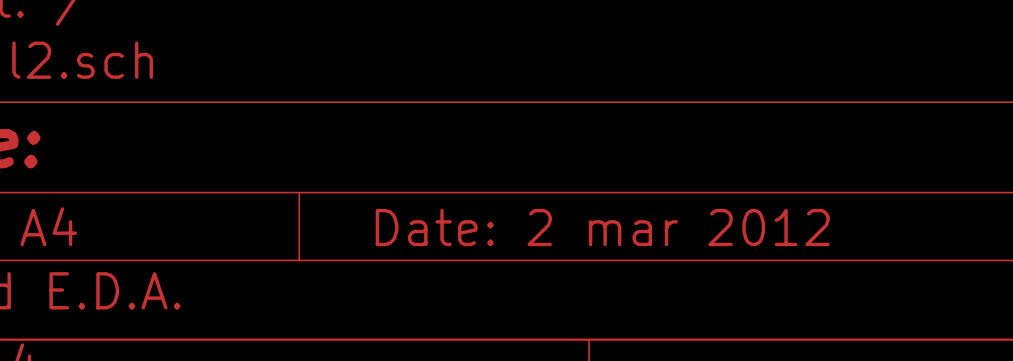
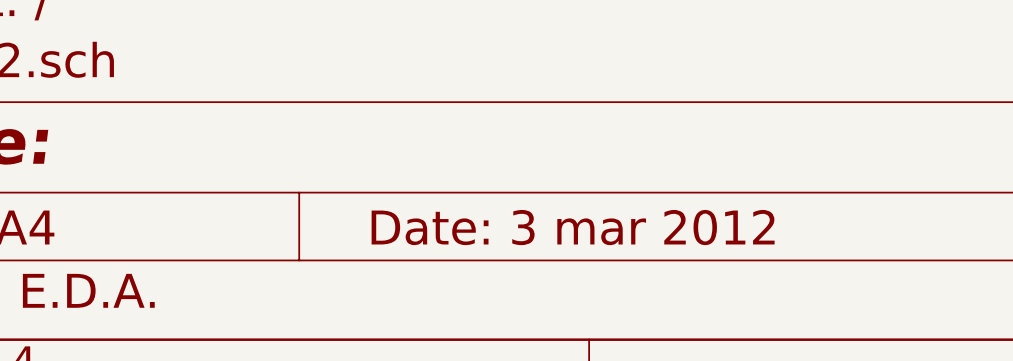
title block: Date: 2 mar 2012 (602, 227) -> Date: 3 mar 2012 (573, 227)

